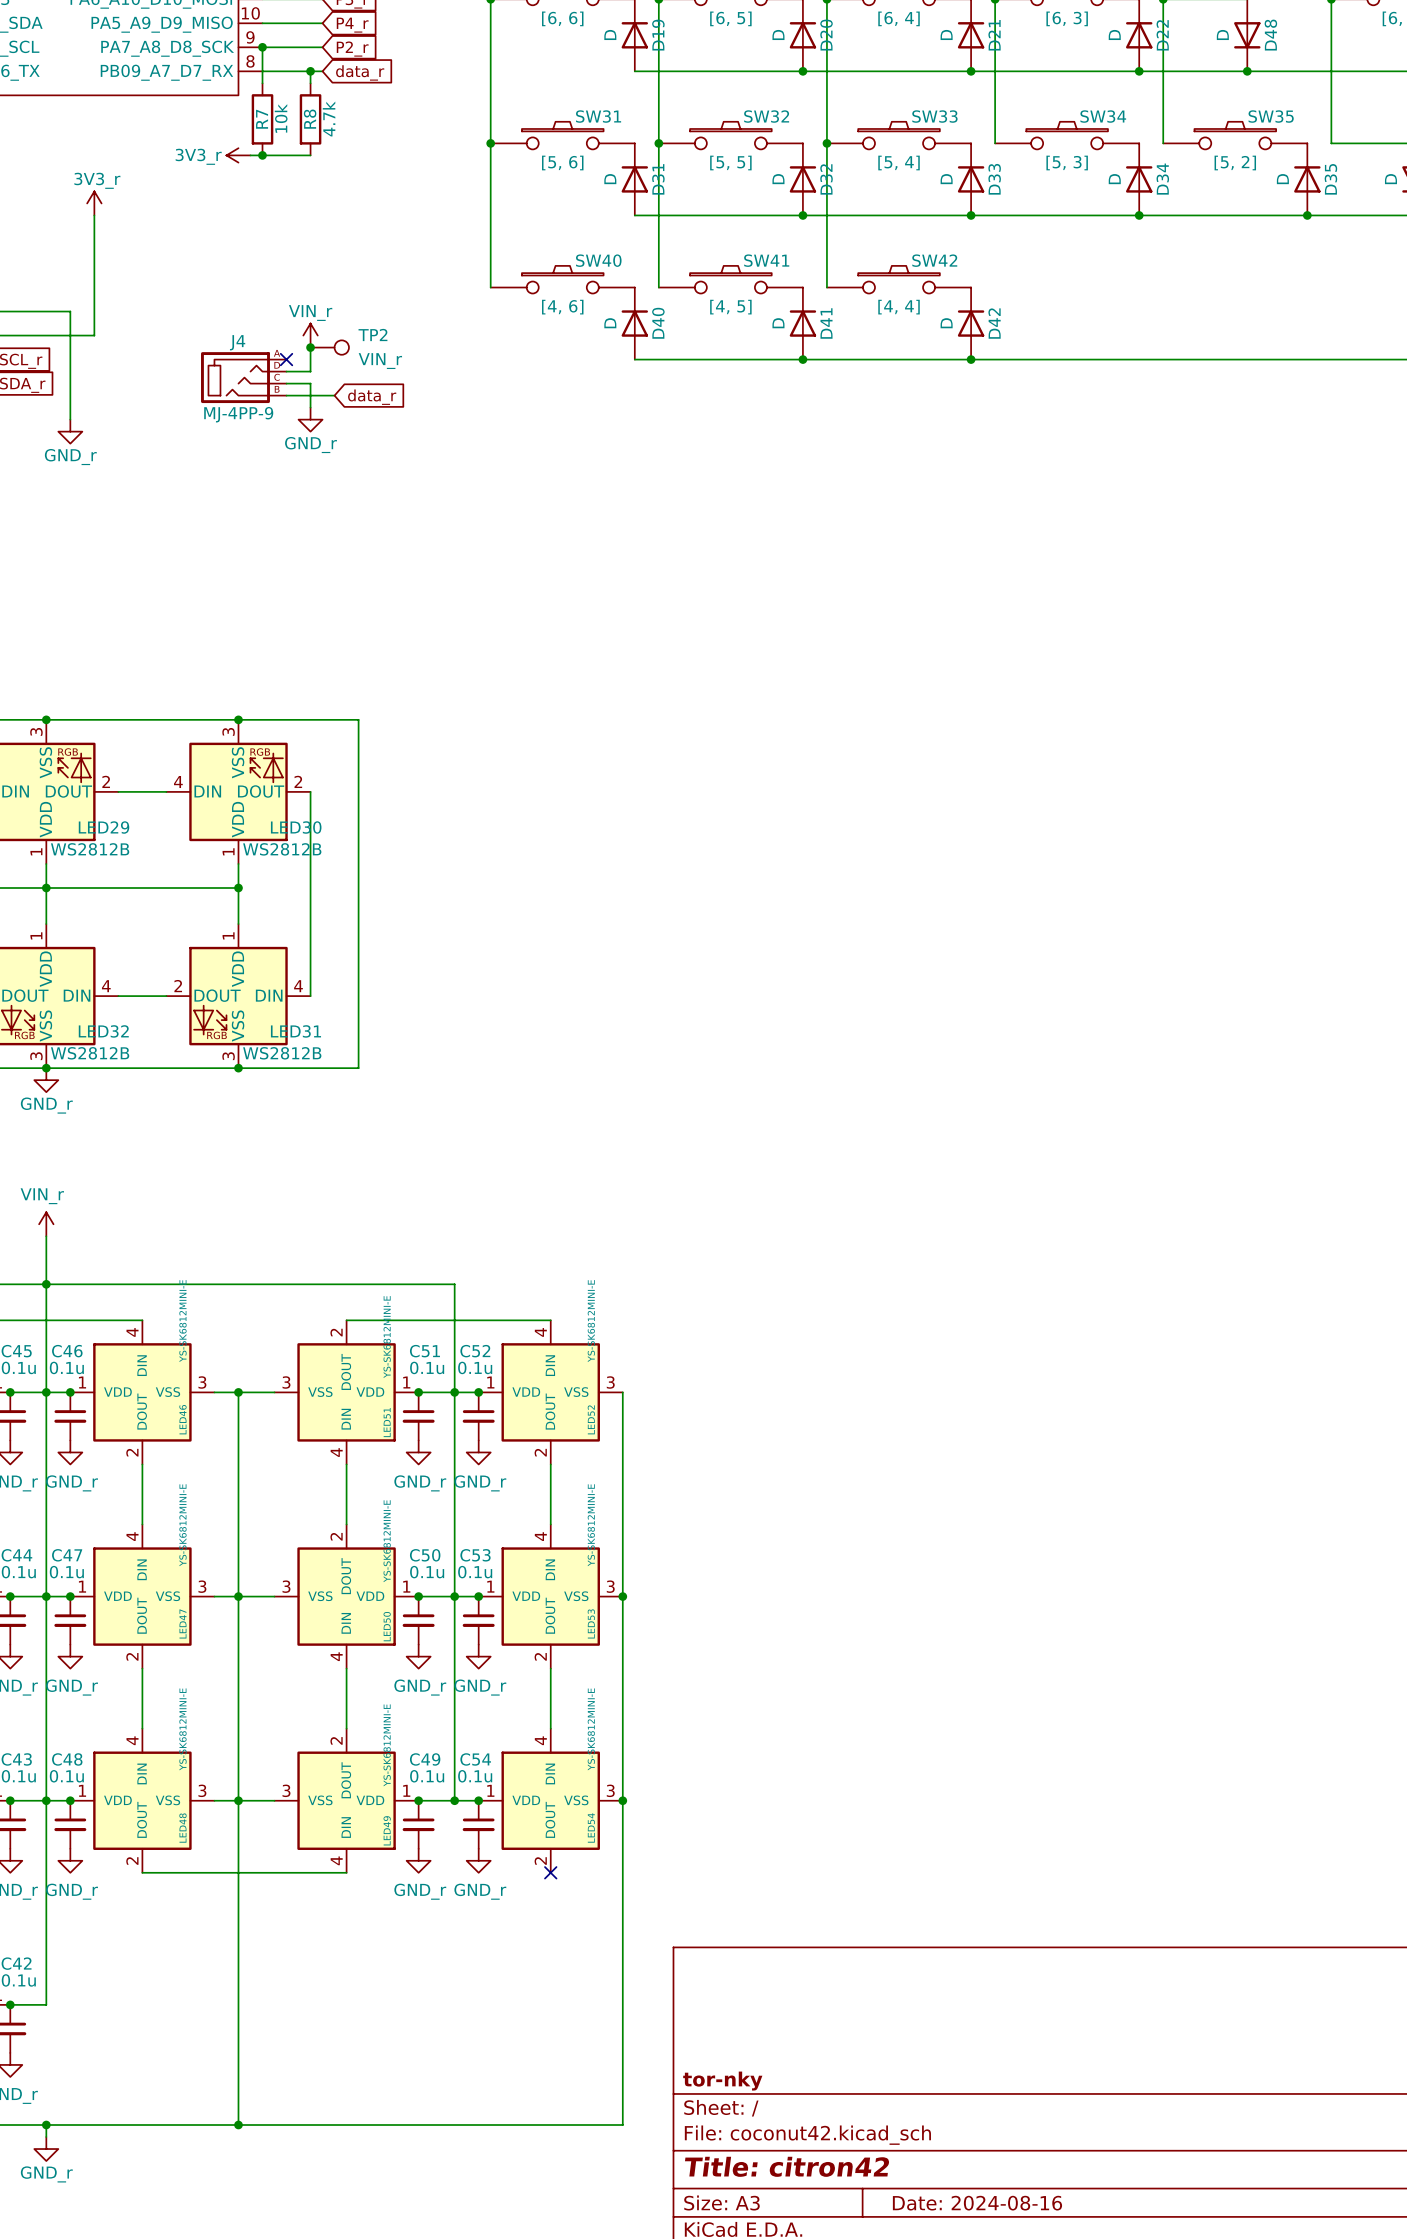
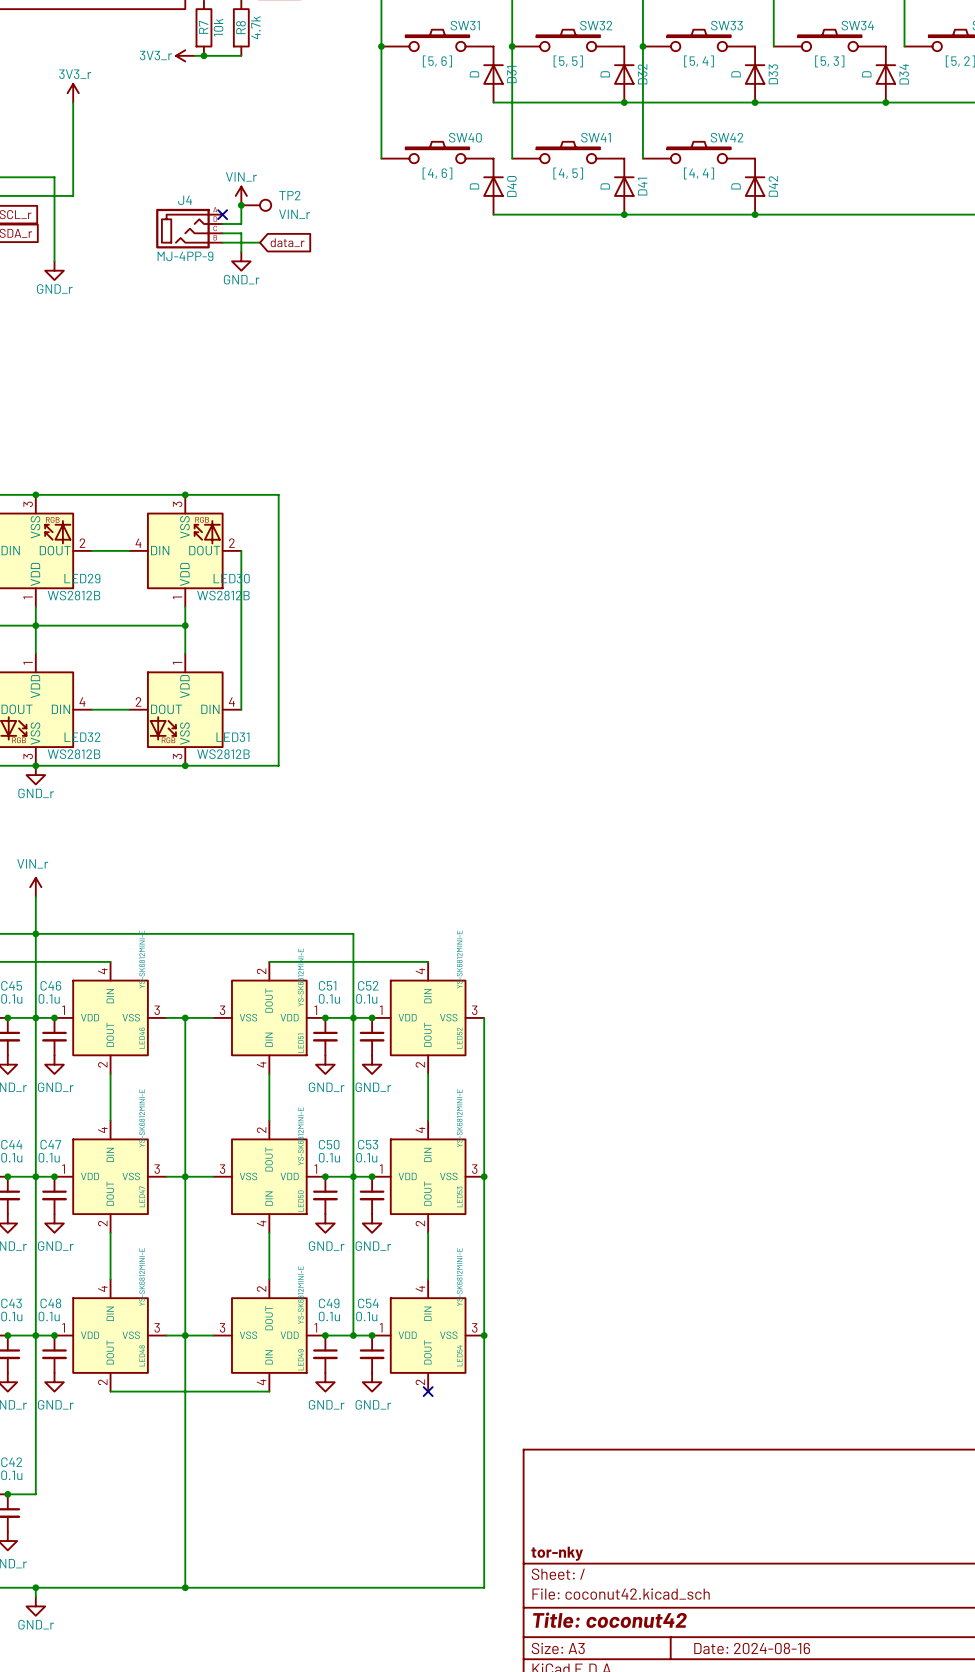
title block: Title: citron42 (787, 2166) -> Title: coconut42 (609, 1620)

